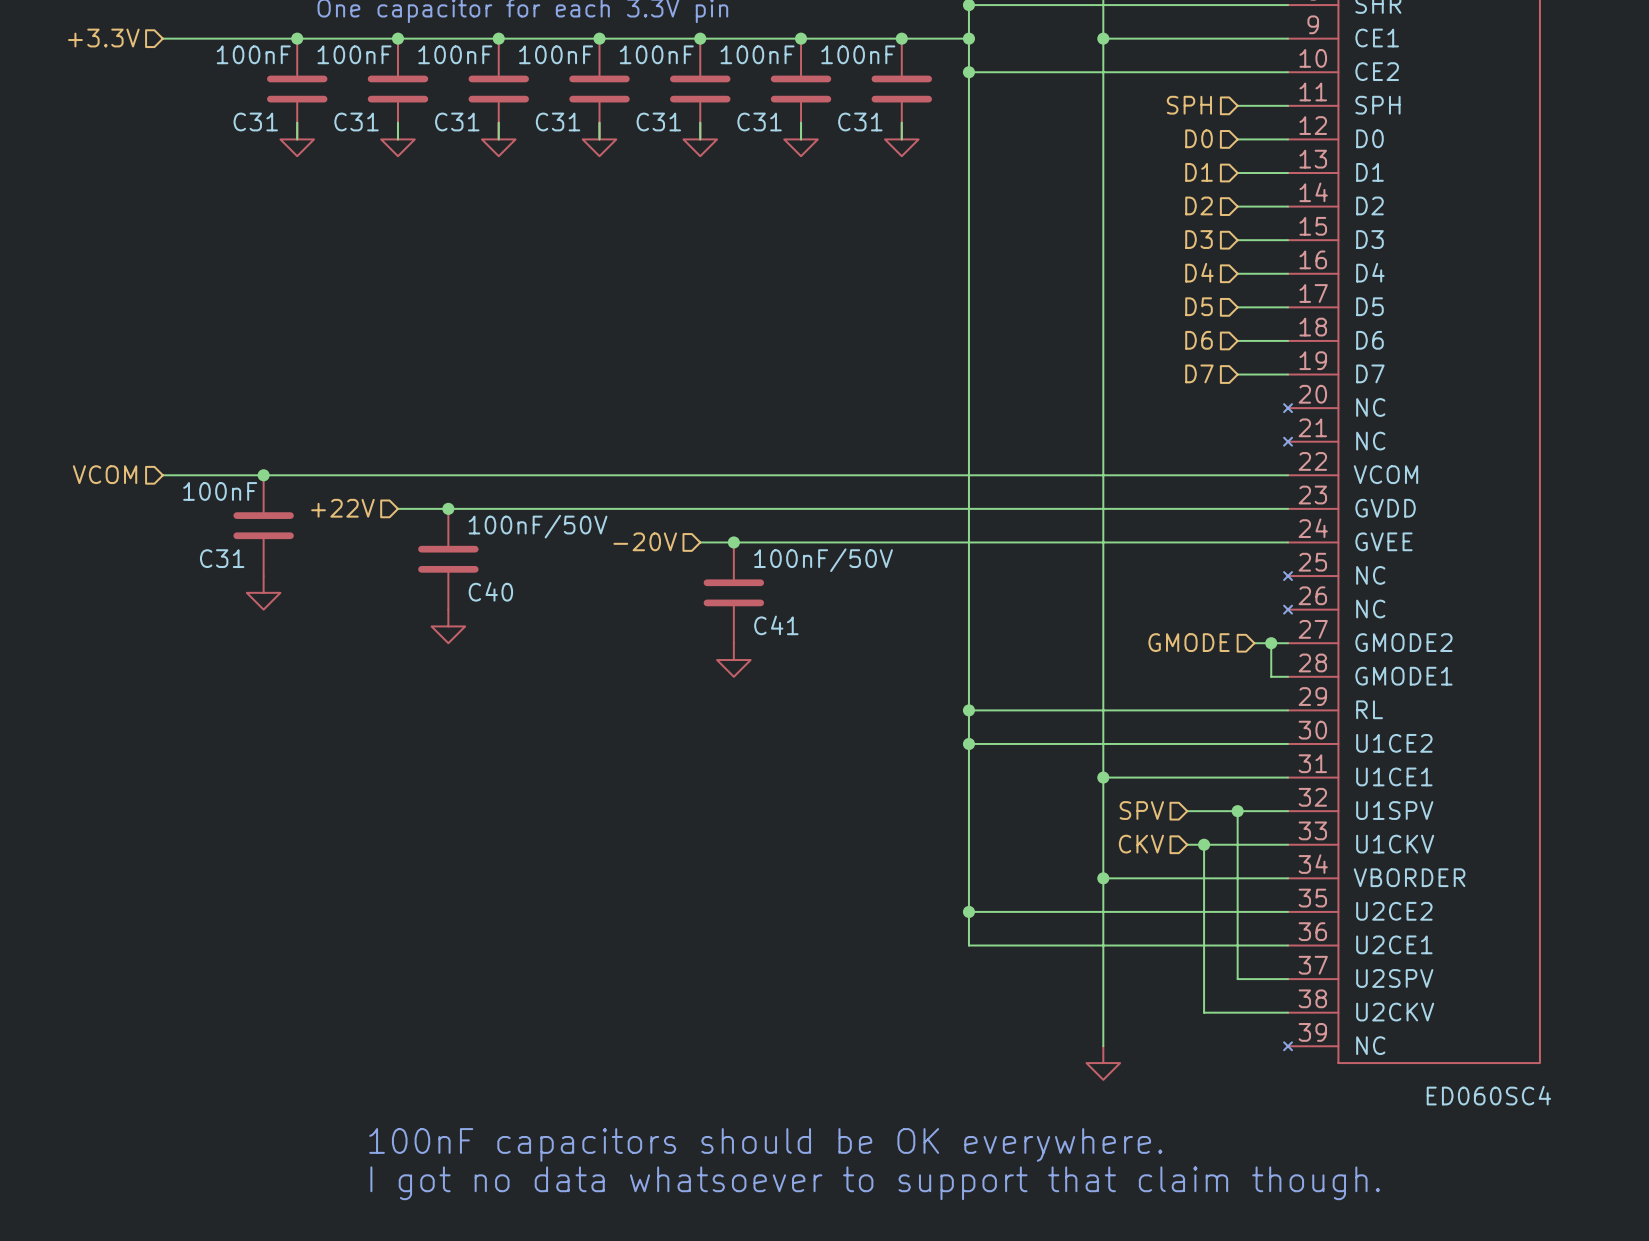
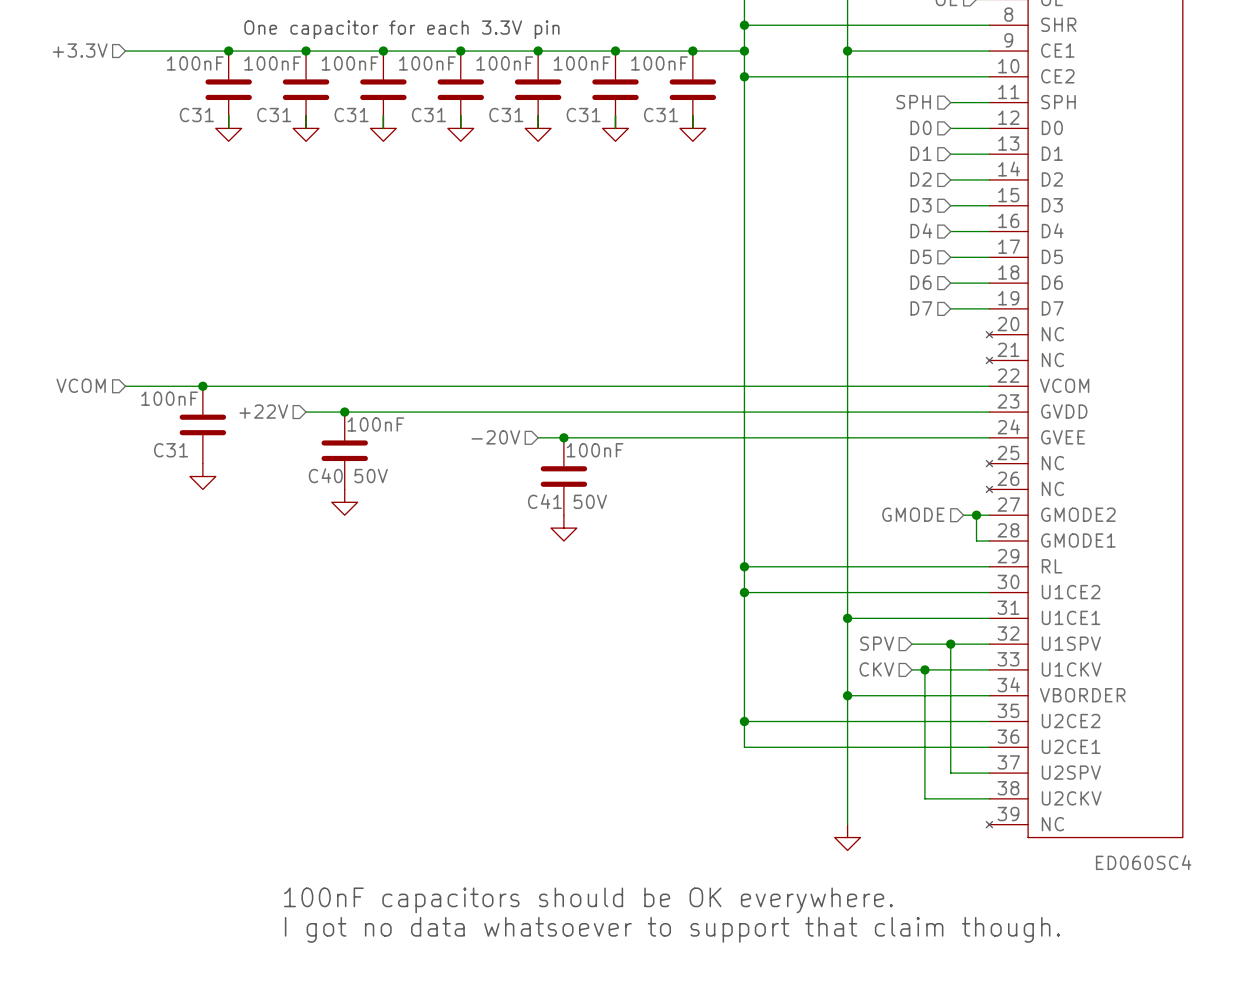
C40 value: 100nF/50V (538, 526) -> 100nF (375, 424)
C41 value: 100nF/50V (823, 560) -> 100nF (595, 450)
C40 name position: C40 (490, 591) -> C40 (325, 475)
C40 text: none -> 50V (371, 476)
C41 text: none -> 50V (590, 501)
C41 name position: C41 (776, 625) -> C41 (544, 501)

